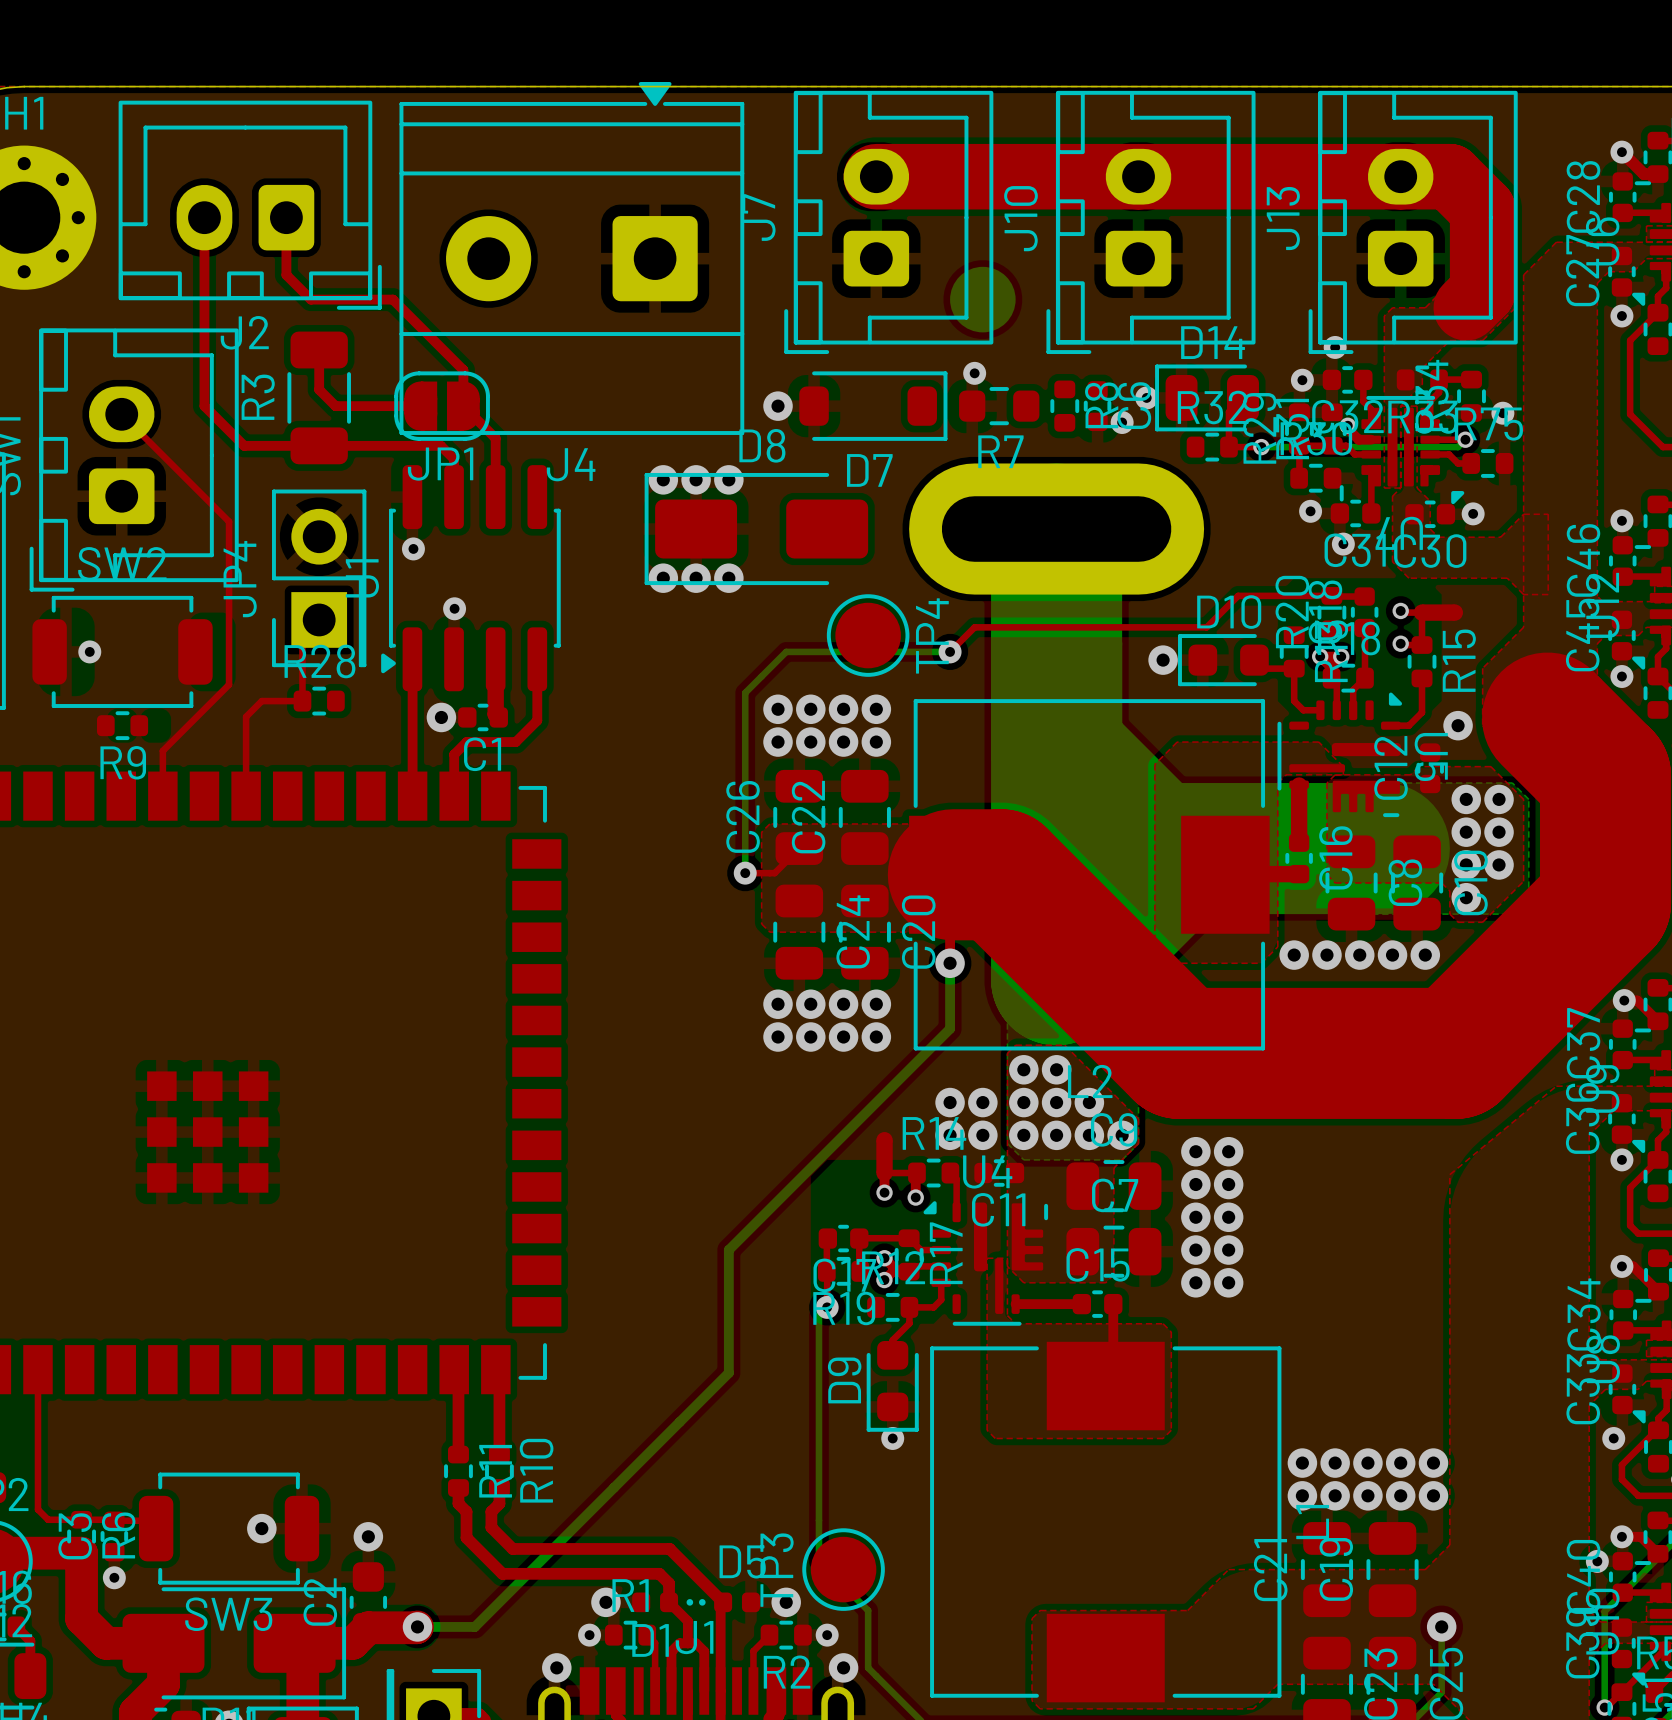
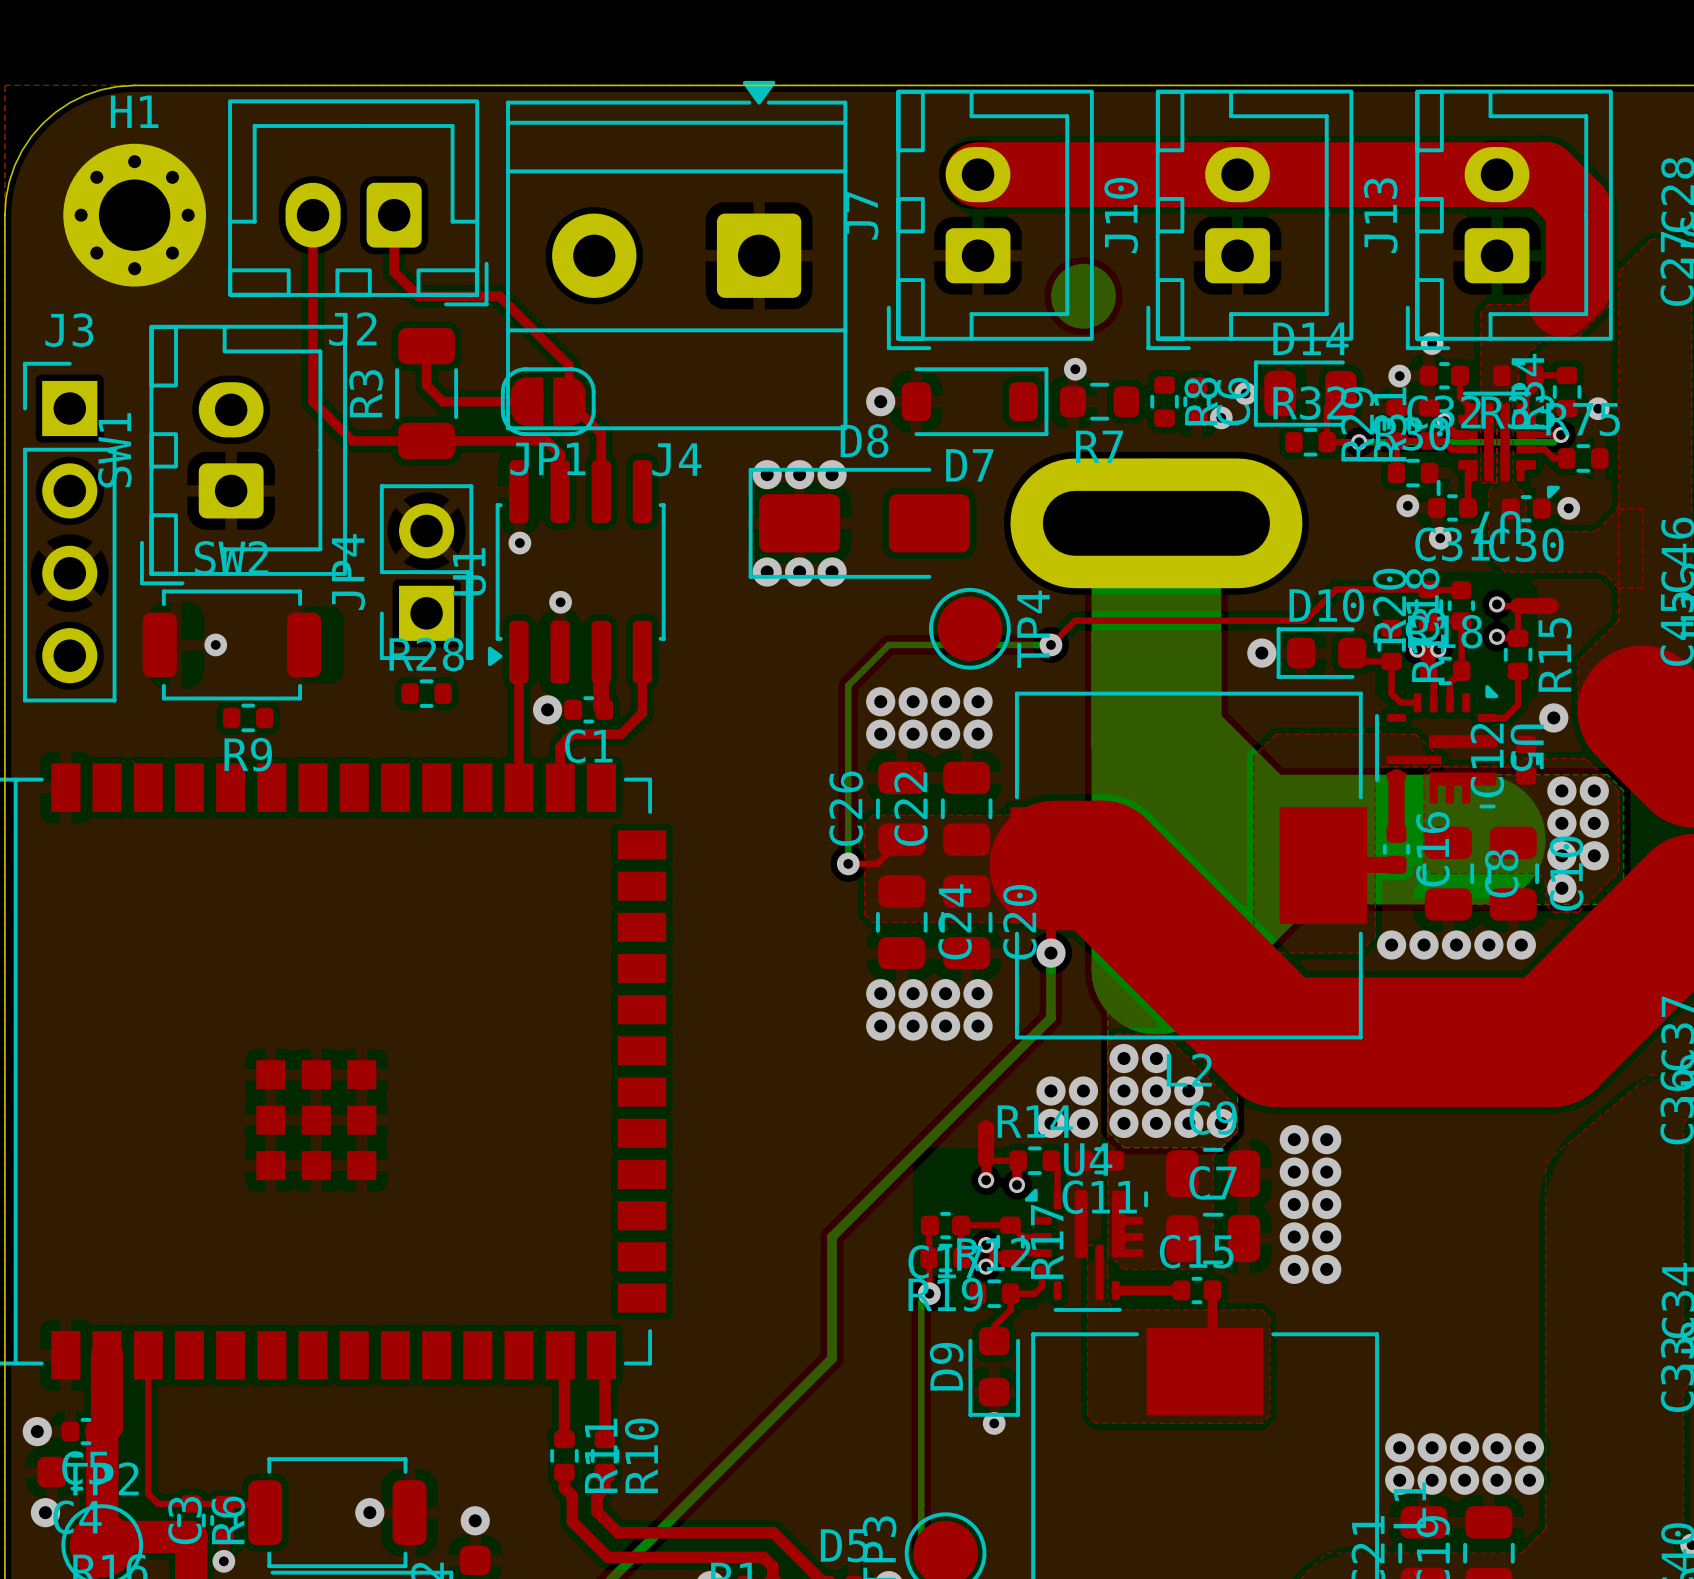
top track: (121, 414) (229, 521) (229, 684) (162, 750) (162, 796) -> none
top track: (319, 619) (302, 636) (302, 701) (261, 701) (246, 716) (246, 796) -> none
via position: (89, 651) -> (215, 644)
R9 position: (122, 725) -> (248, 717)

